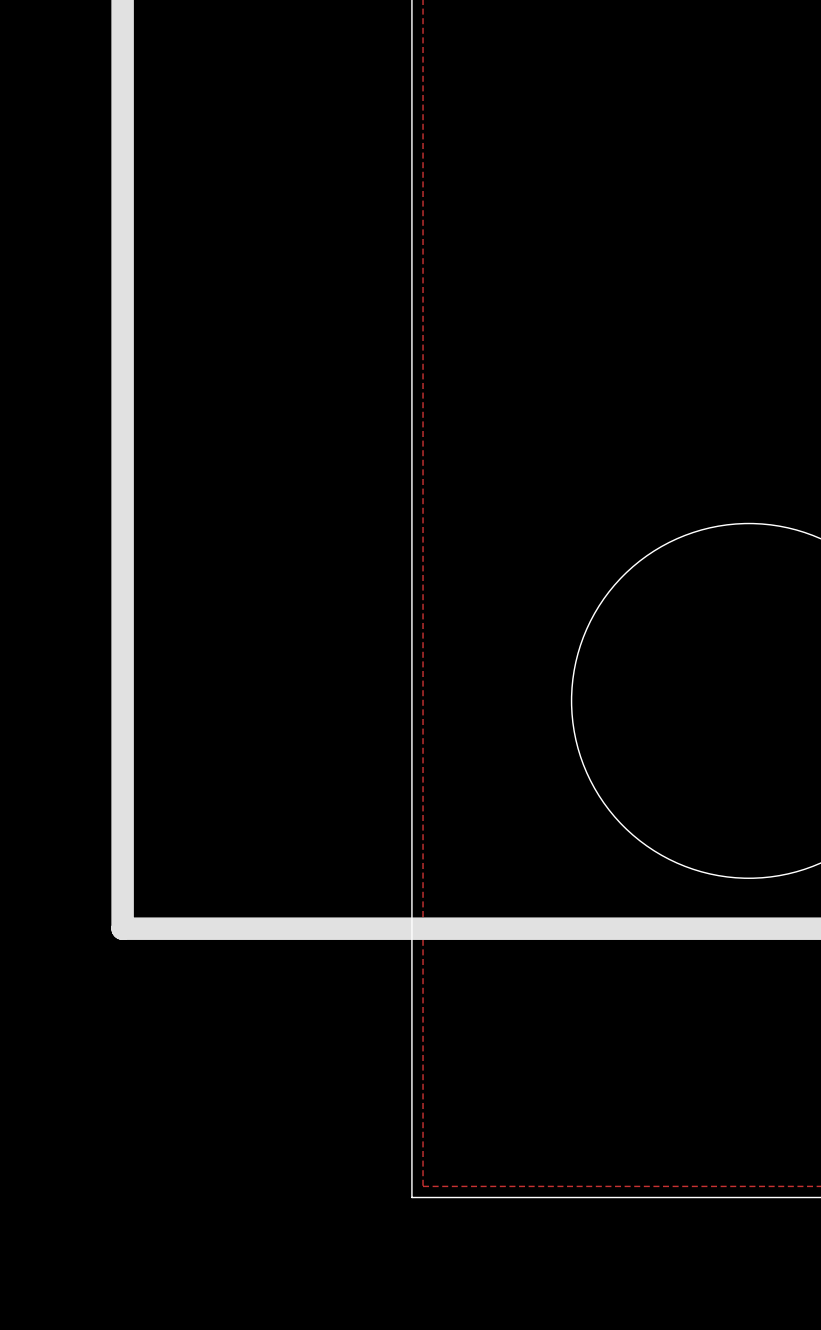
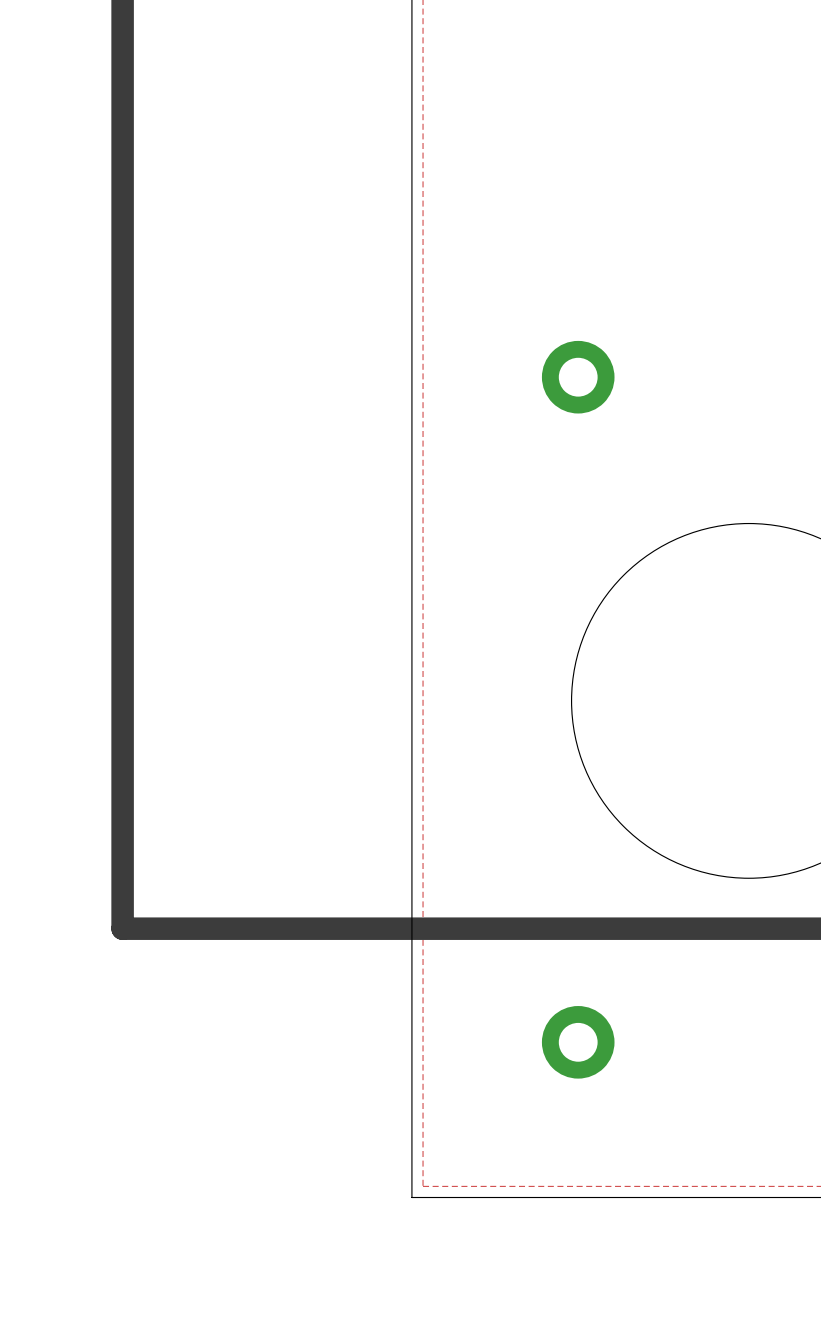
via: none -> (578, 377)
via: none -> (578, 1042)

